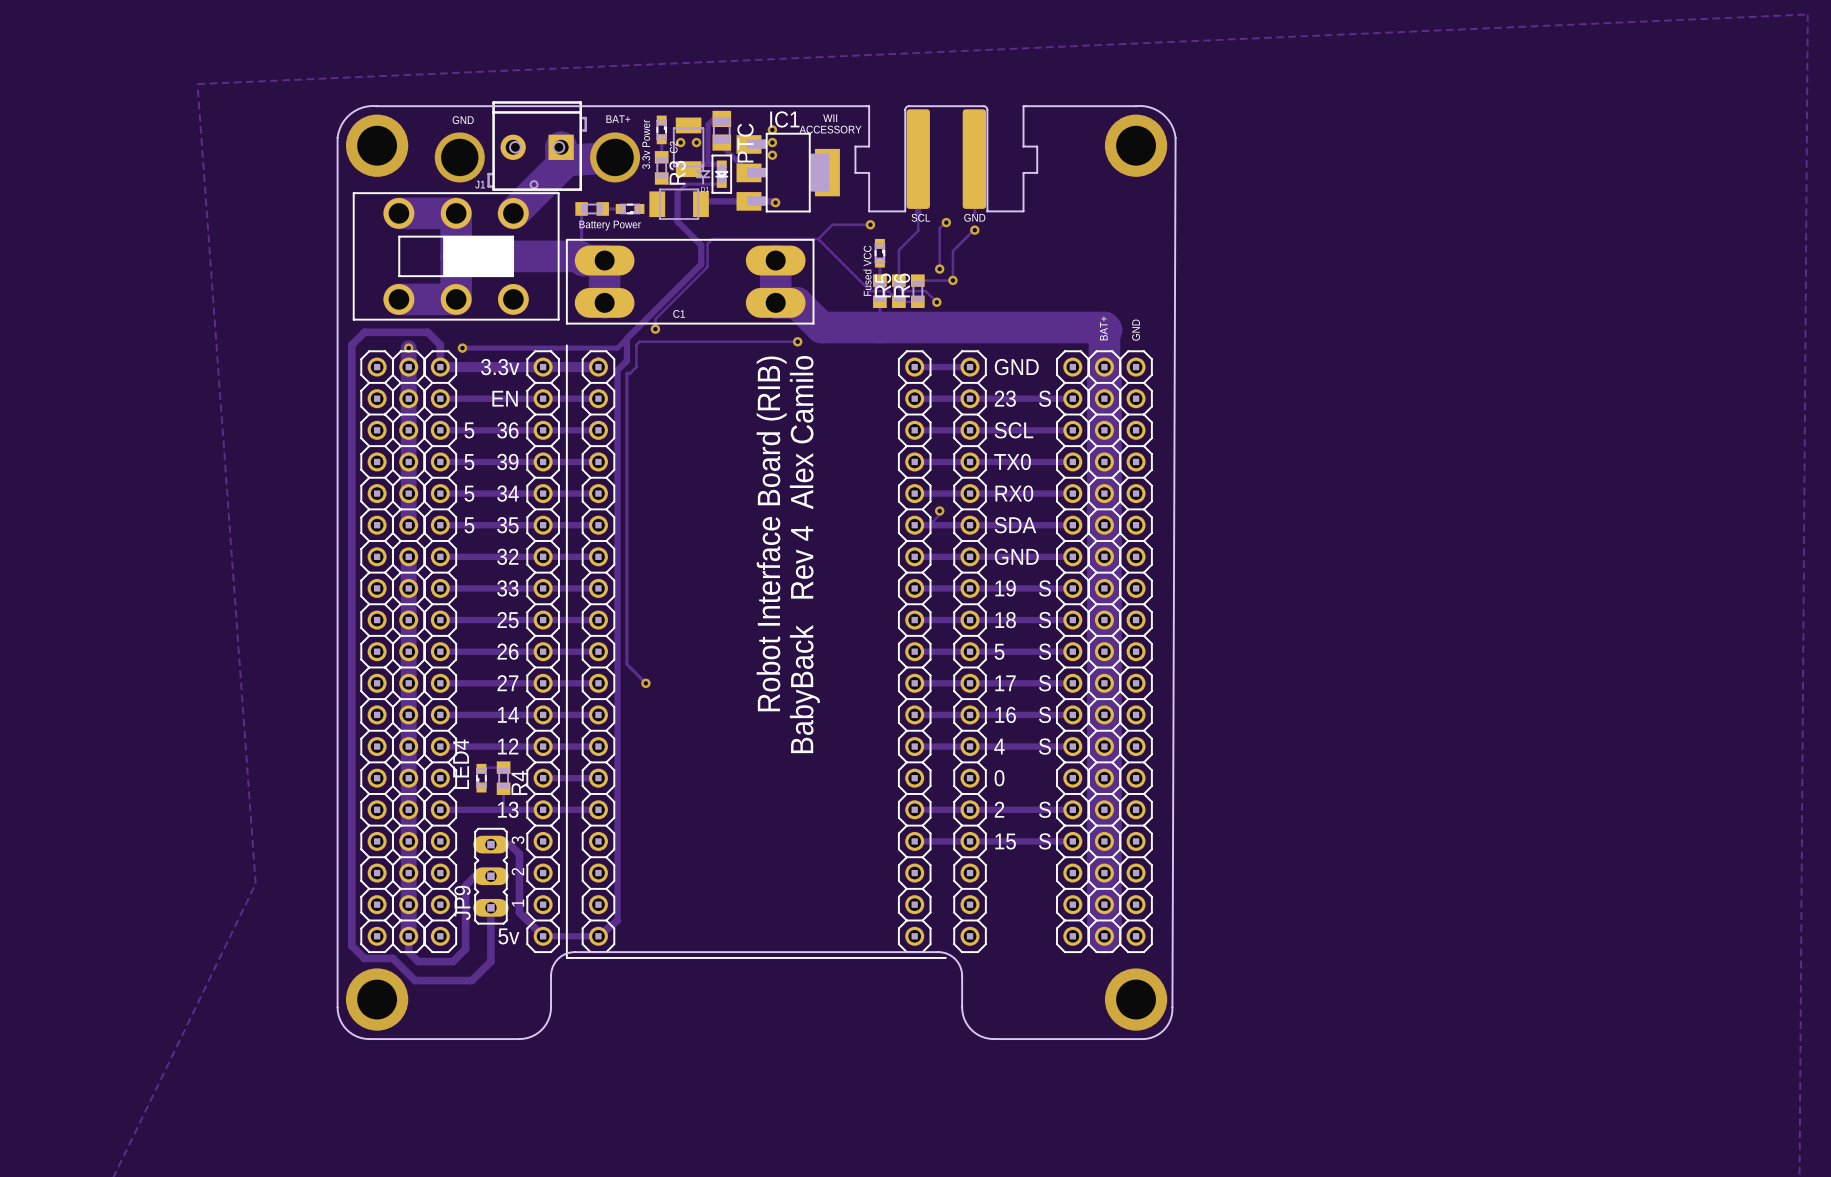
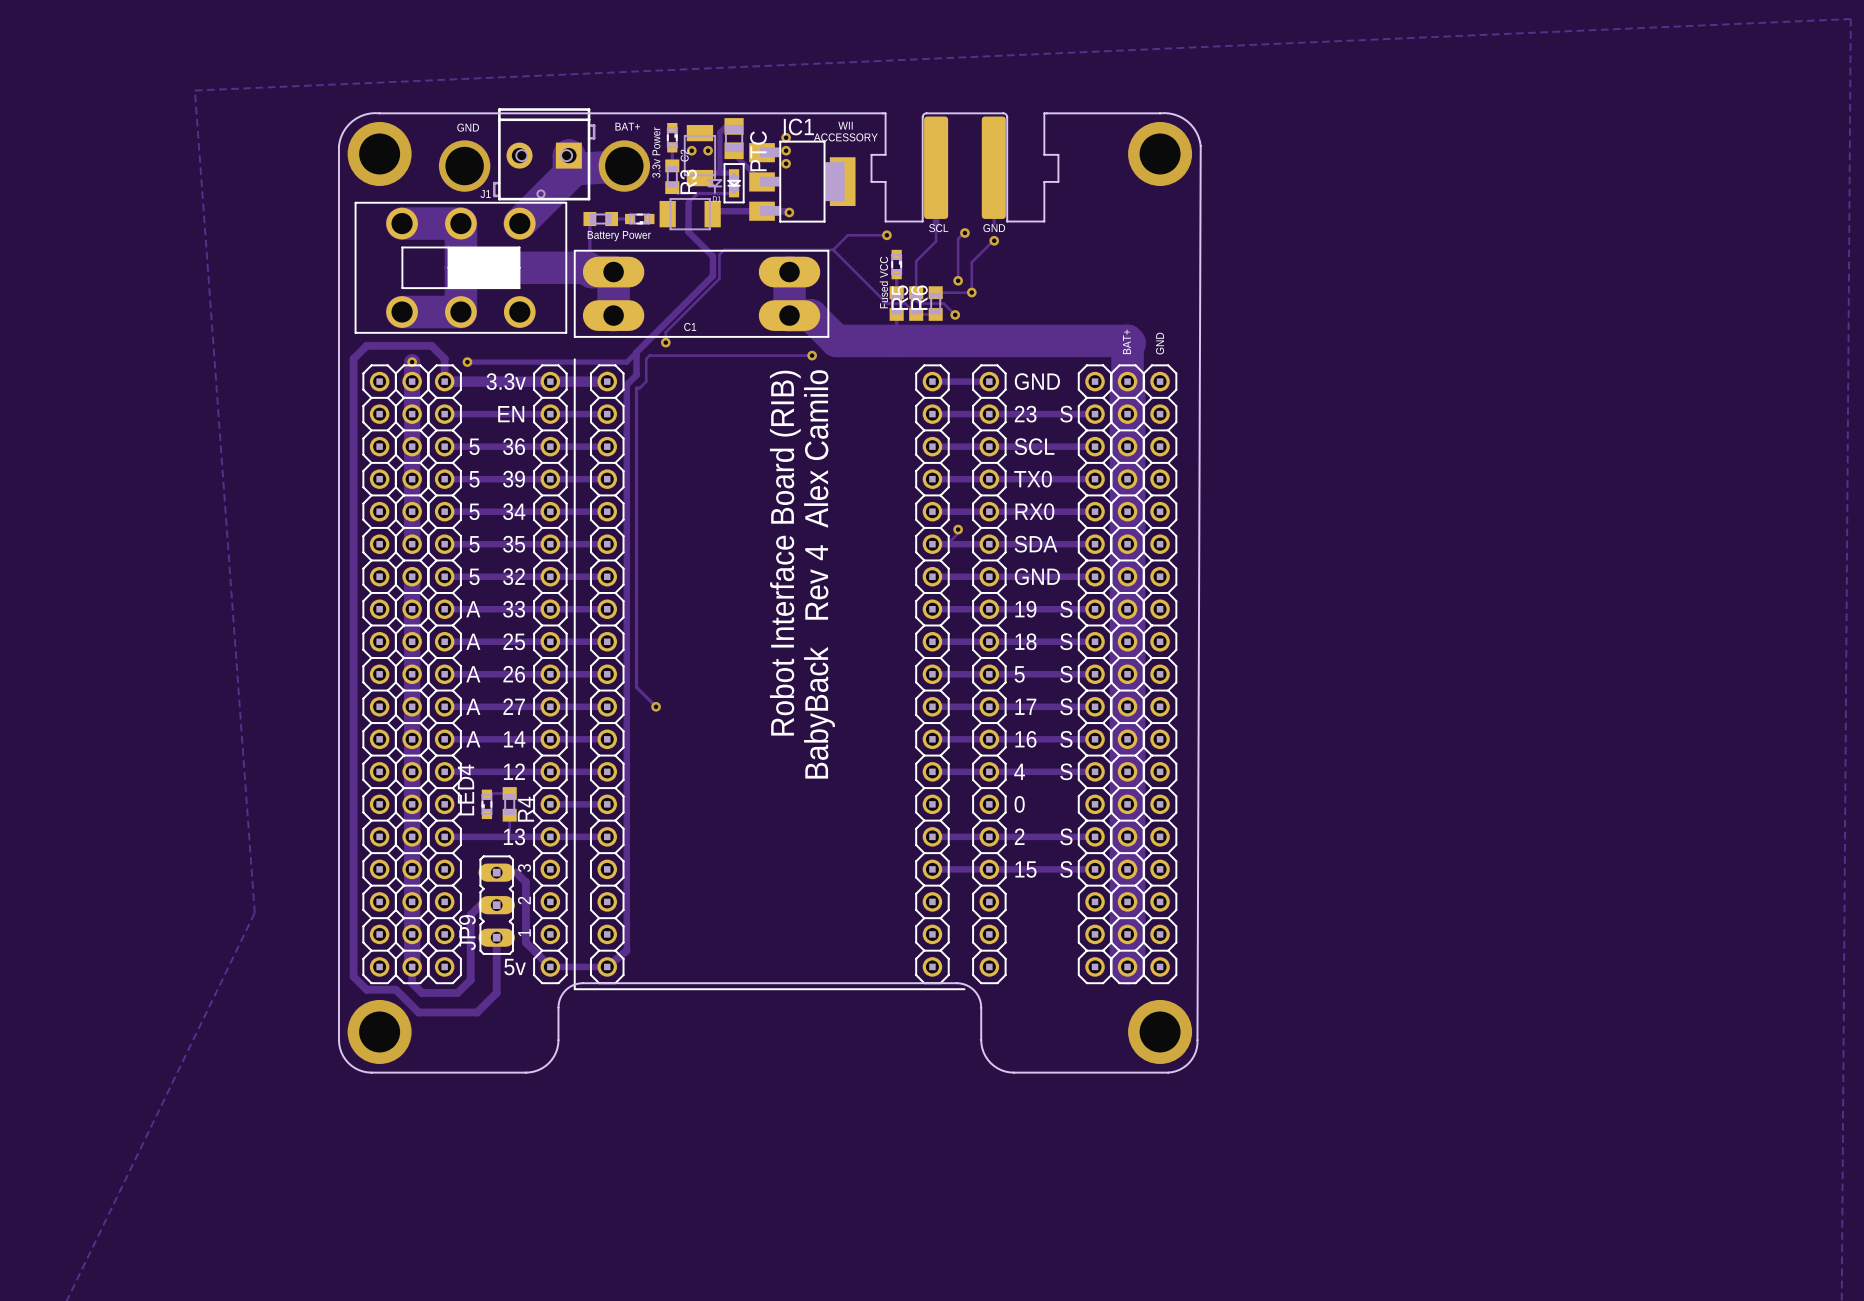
text: none -> 5 (474, 576)
text: none -> A (473, 609)
text: none -> A (473, 641)
text: none -> A (473, 674)
text: none -> A (473, 706)
text: none -> A (473, 739)

